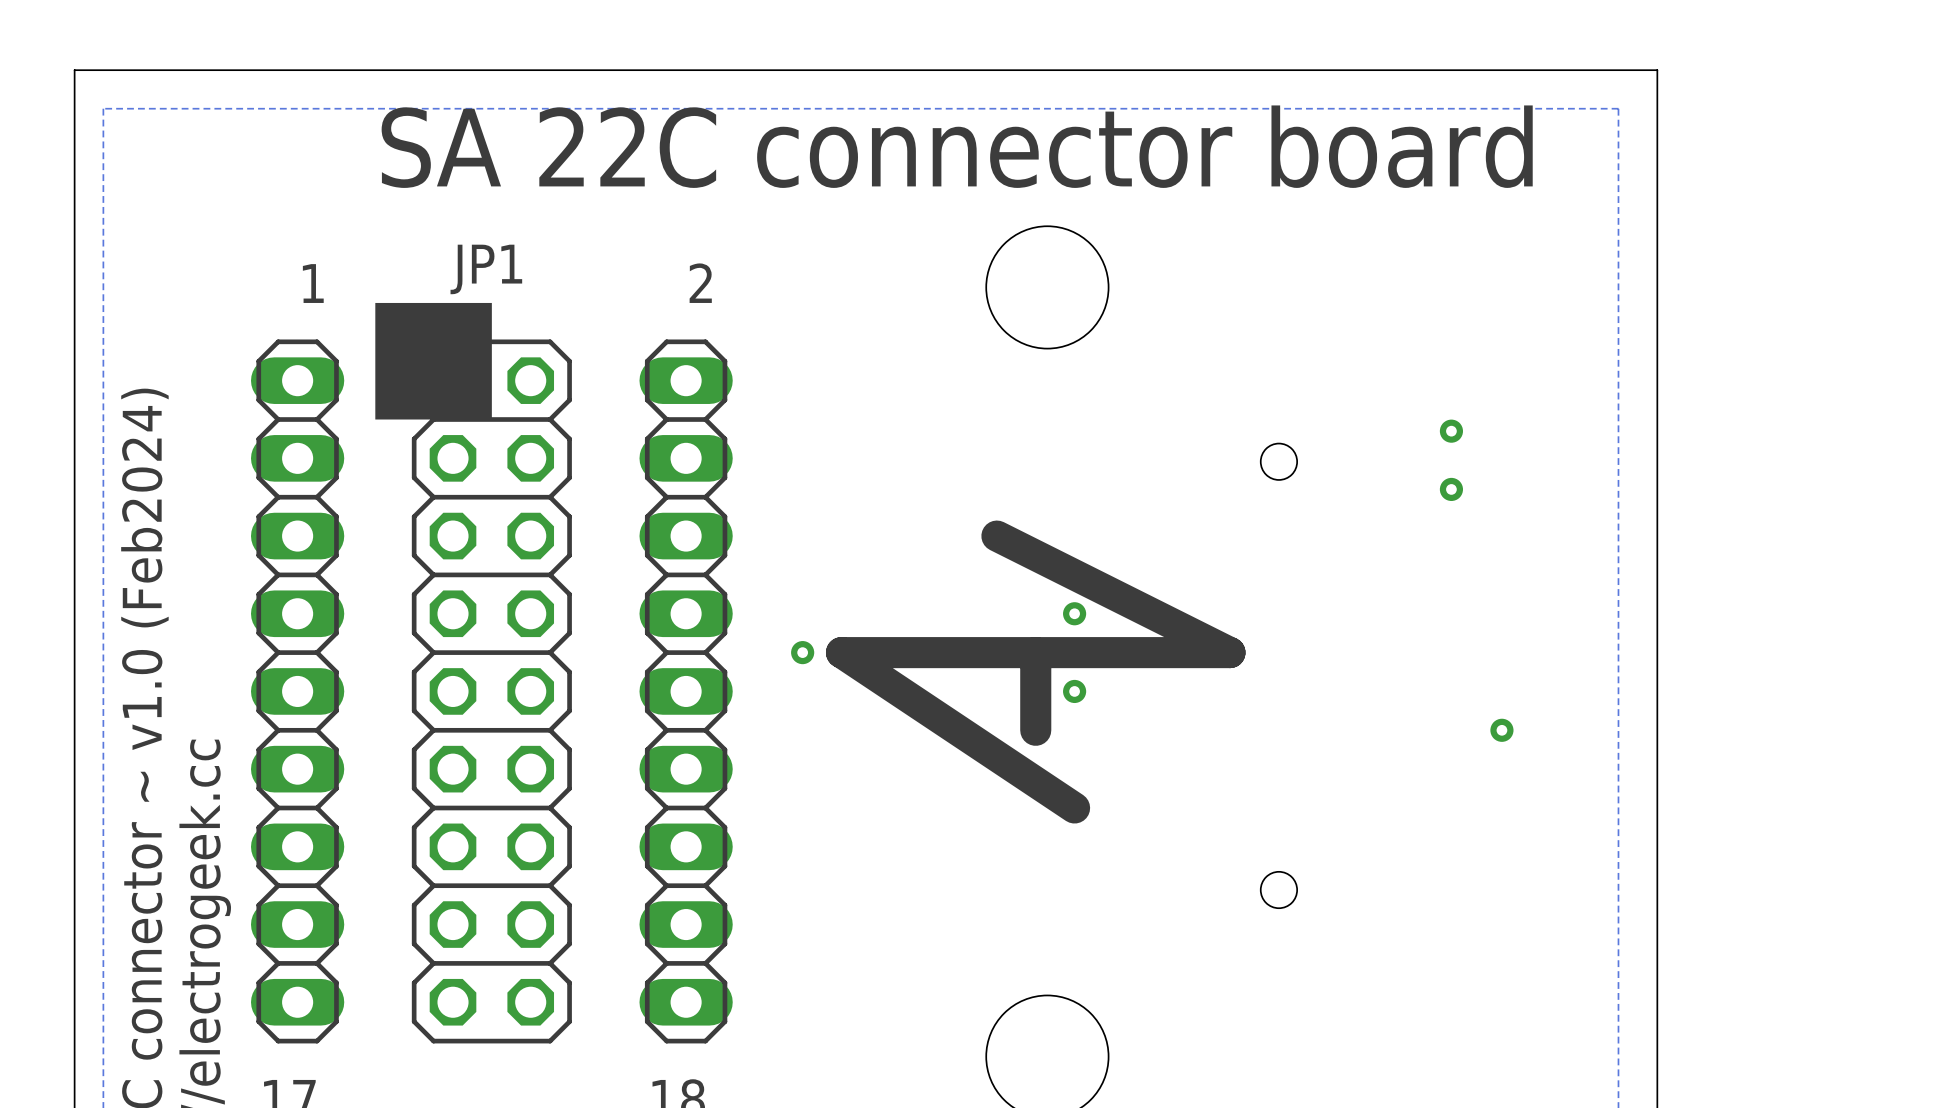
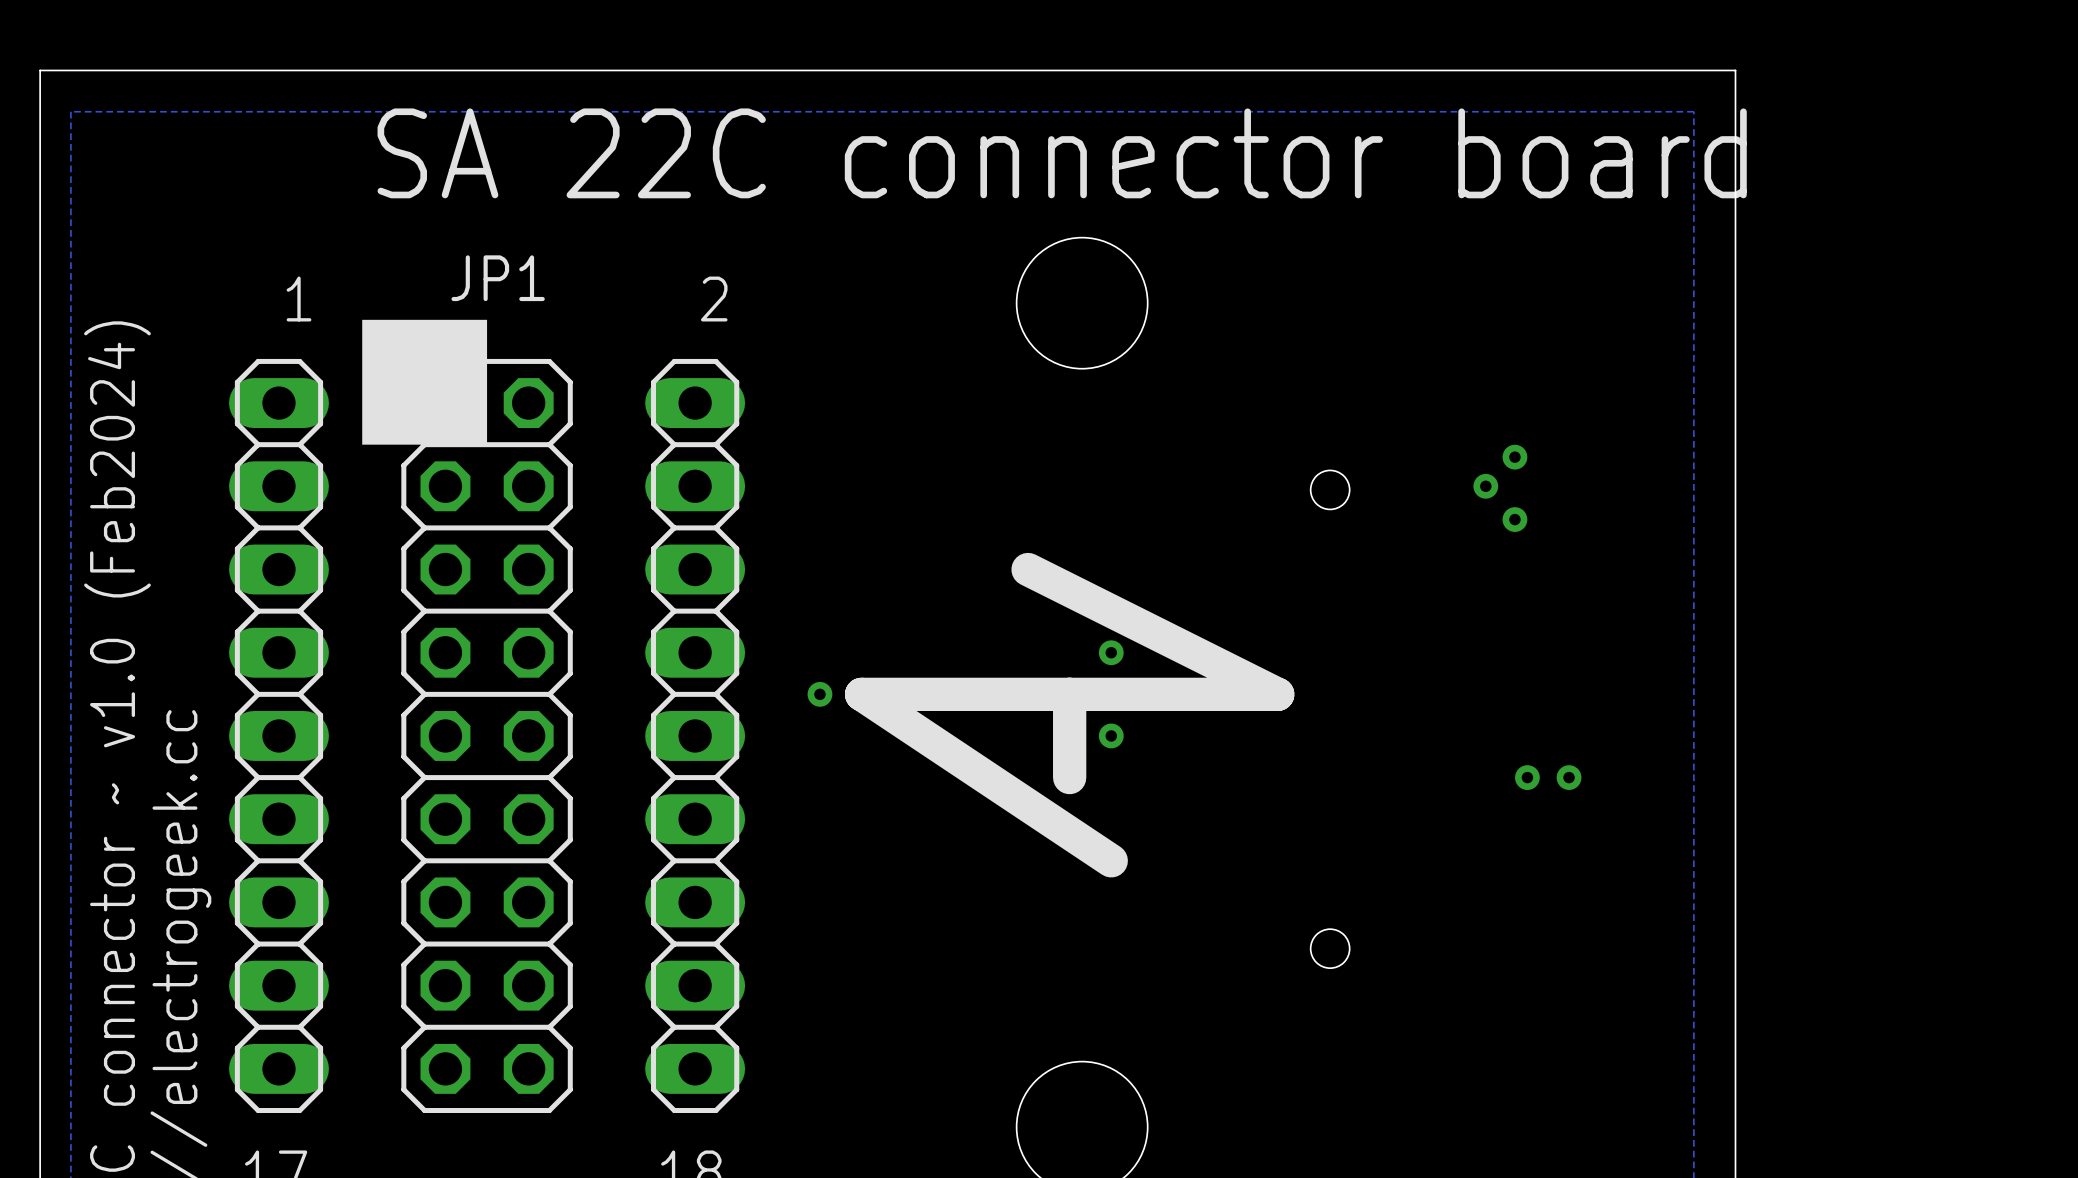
via: none -> (1485, 486)
via: none -> (1527, 777)

